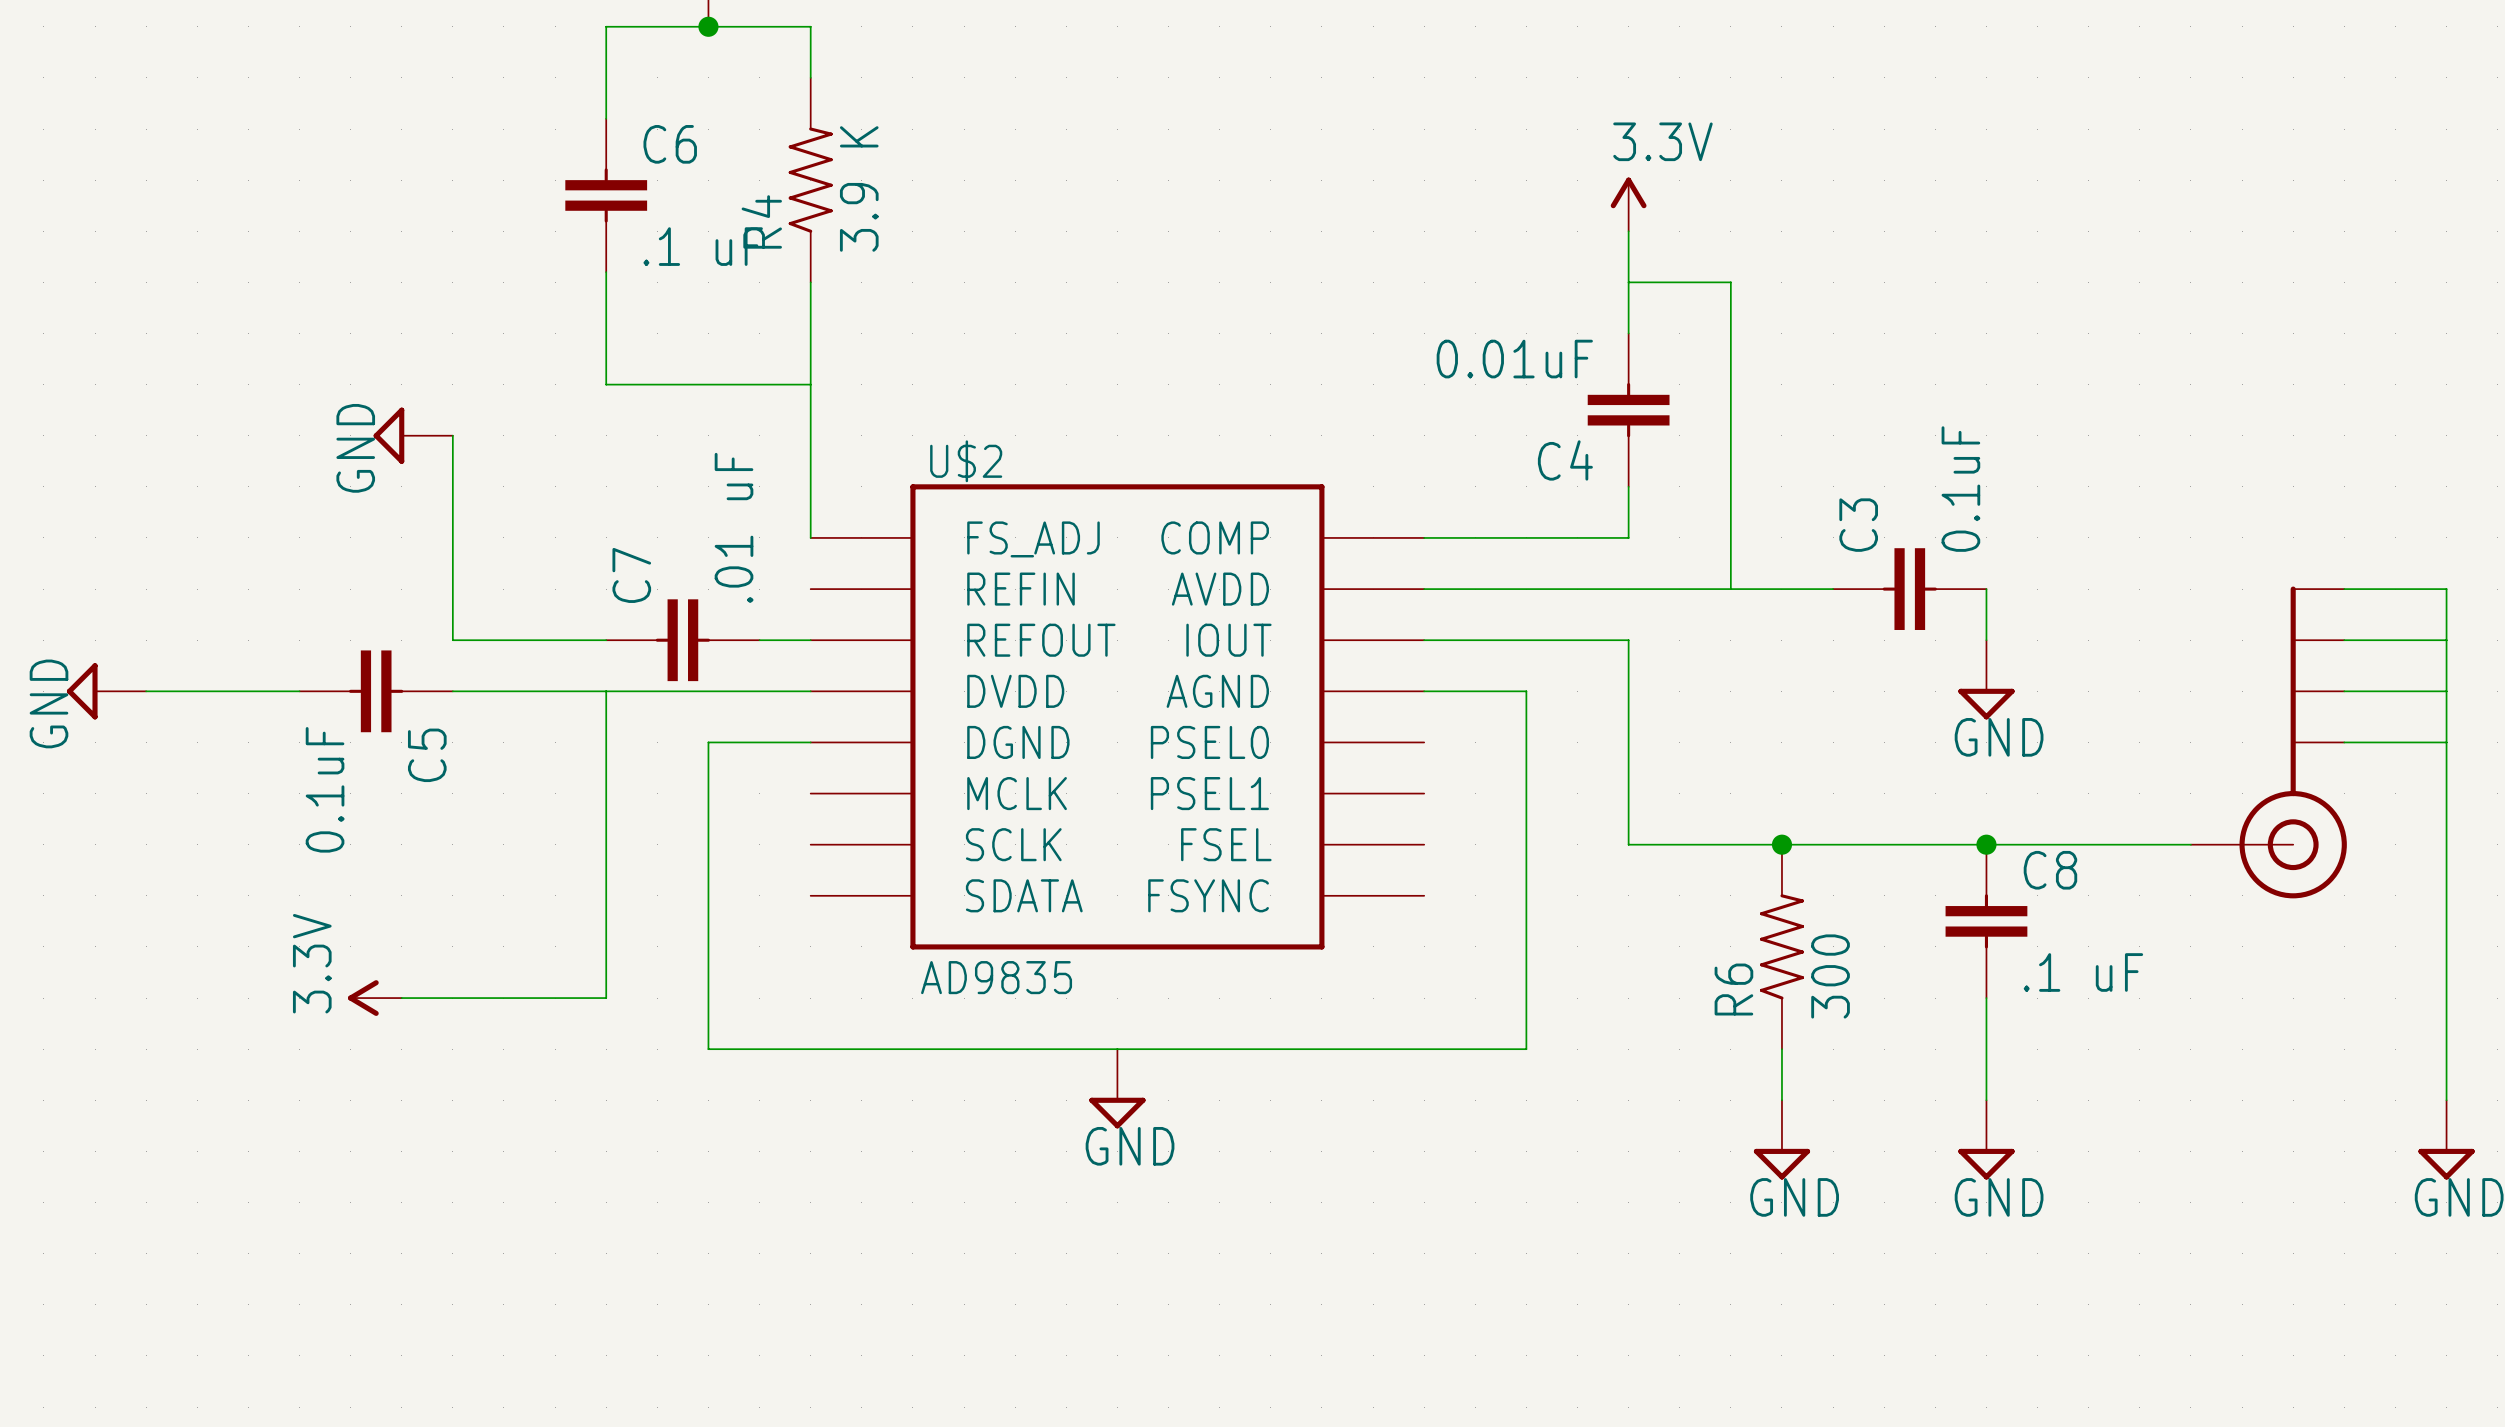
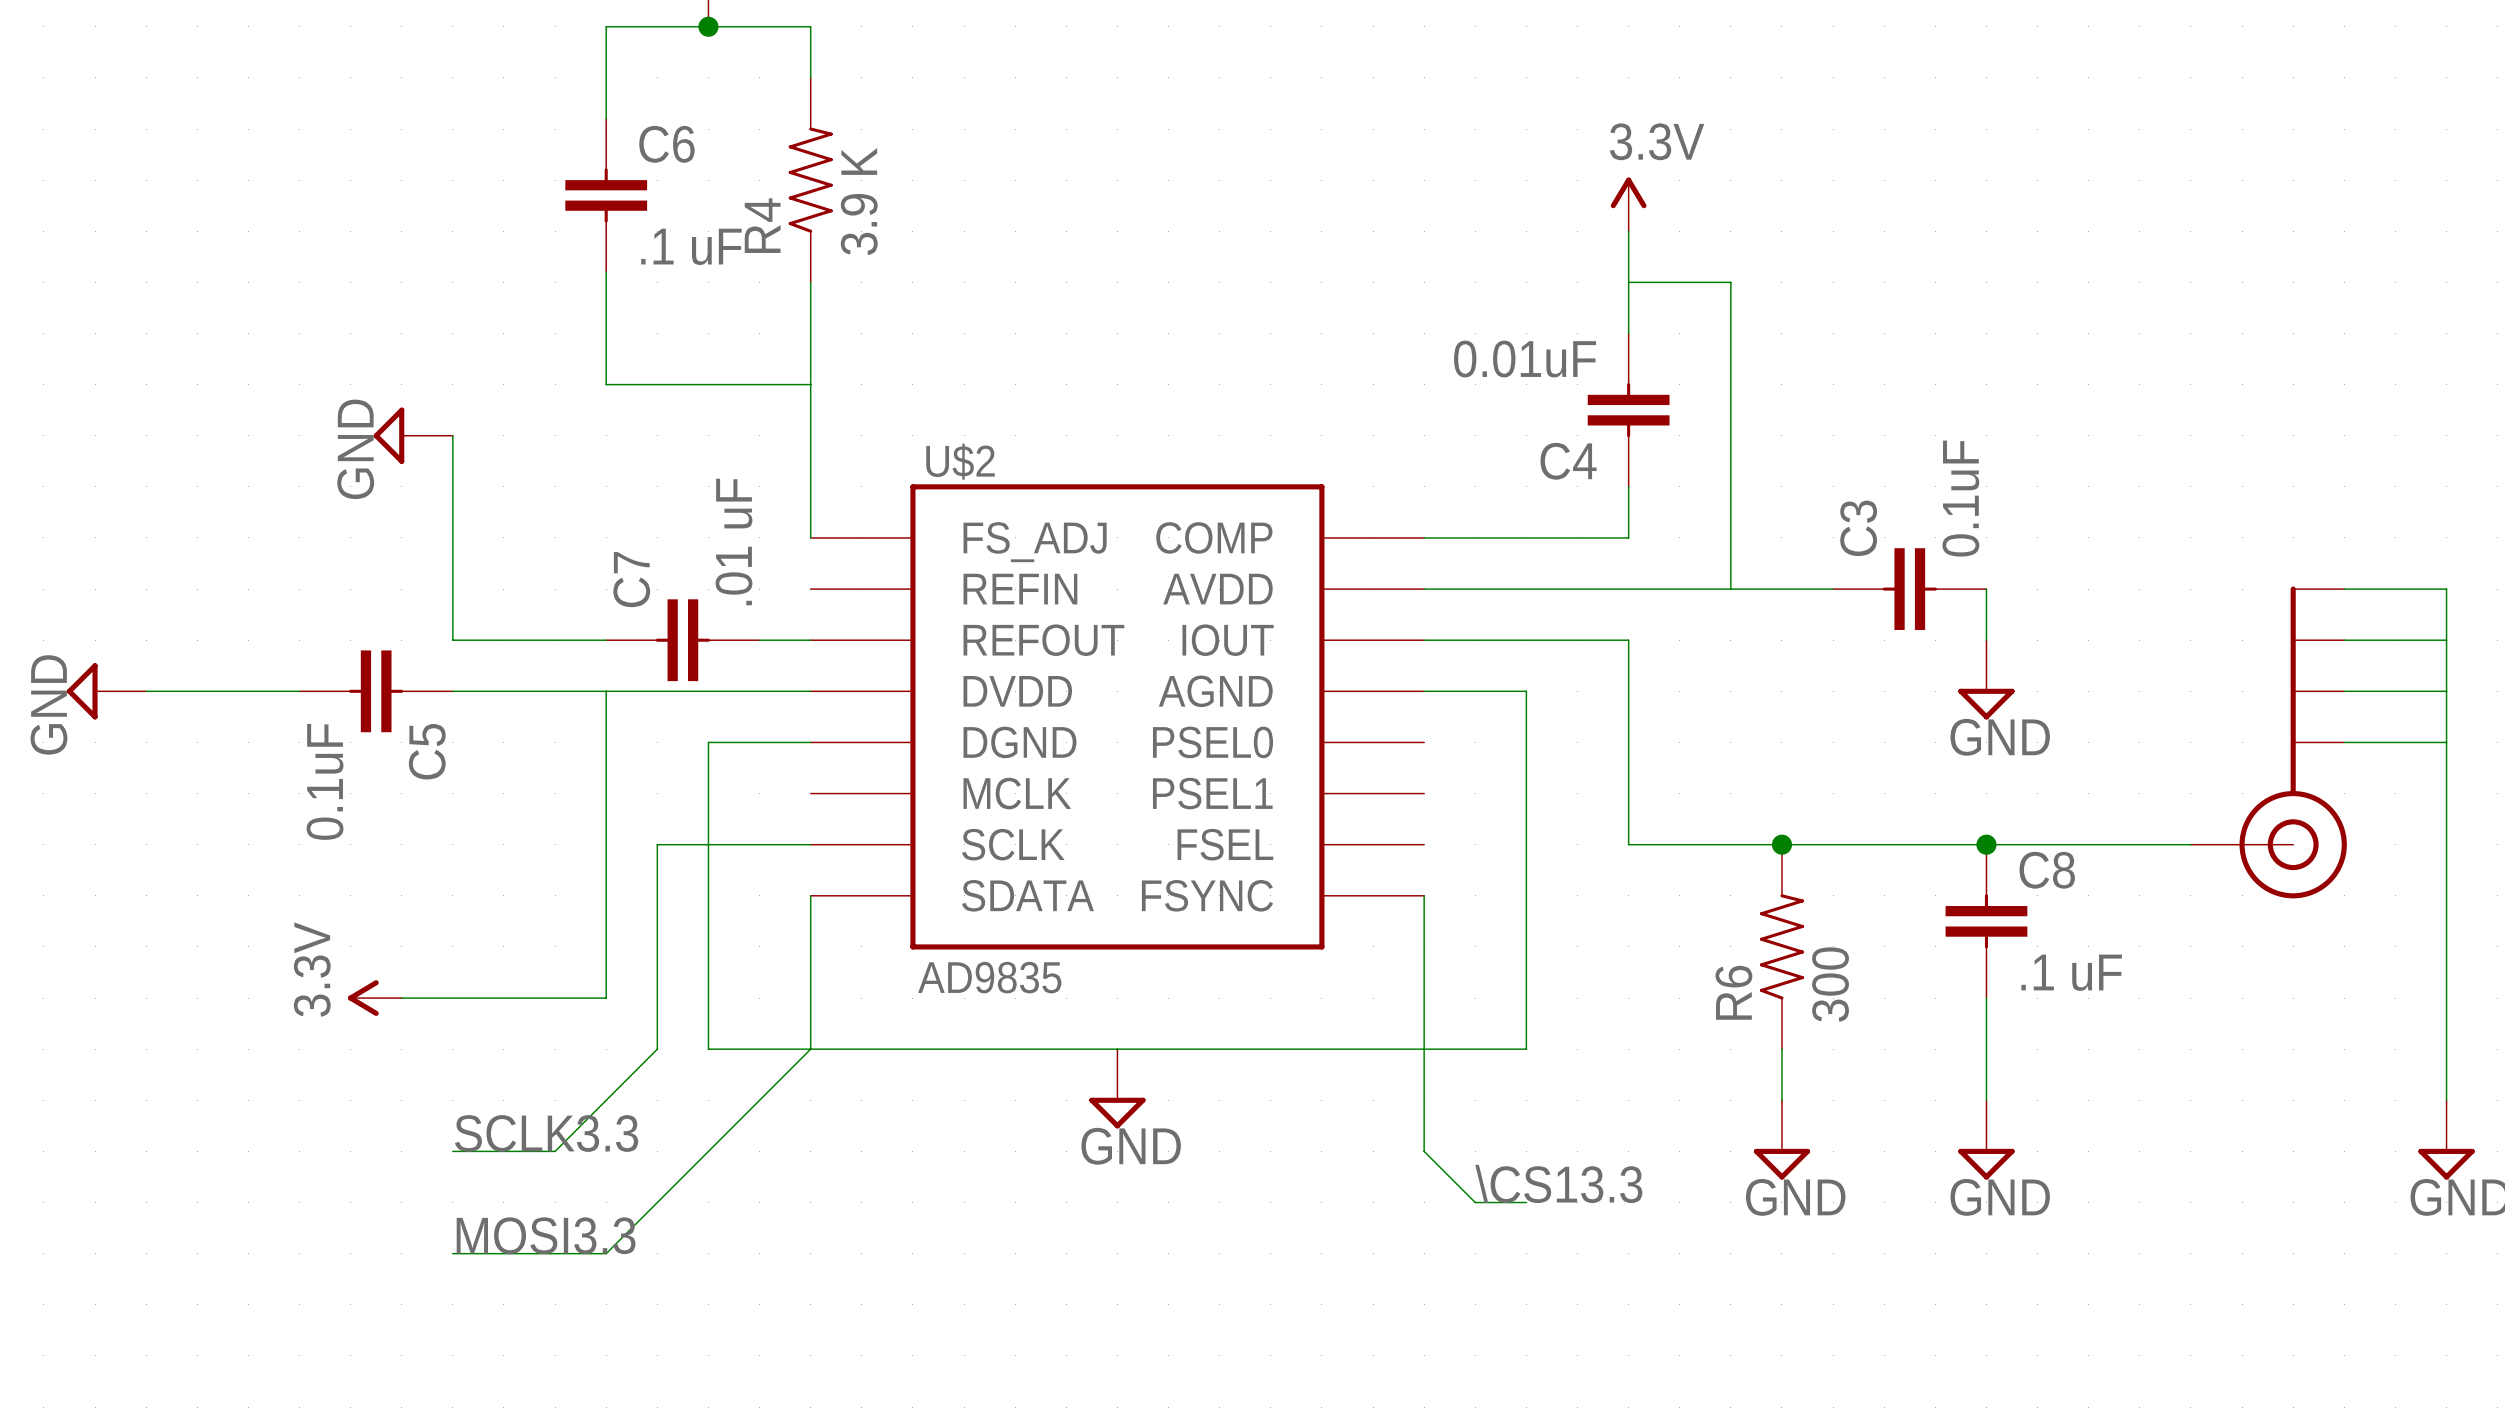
wire: none -> (810, 844) (657, 844) (657, 1049) (555, 1151) (452, 1151)
wire: none -> (810, 895) (810, 1049) (606, 1253) (452, 1253)
wire: none -> (1424, 895) (1424, 1151) (1475, 1202) (1526, 1202)
label: none -> SCLK3.3 (546, 1133)
label: none -> \CS13.3 (1558, 1183)
label: none -> MOSI3.3 (546, 1235)

